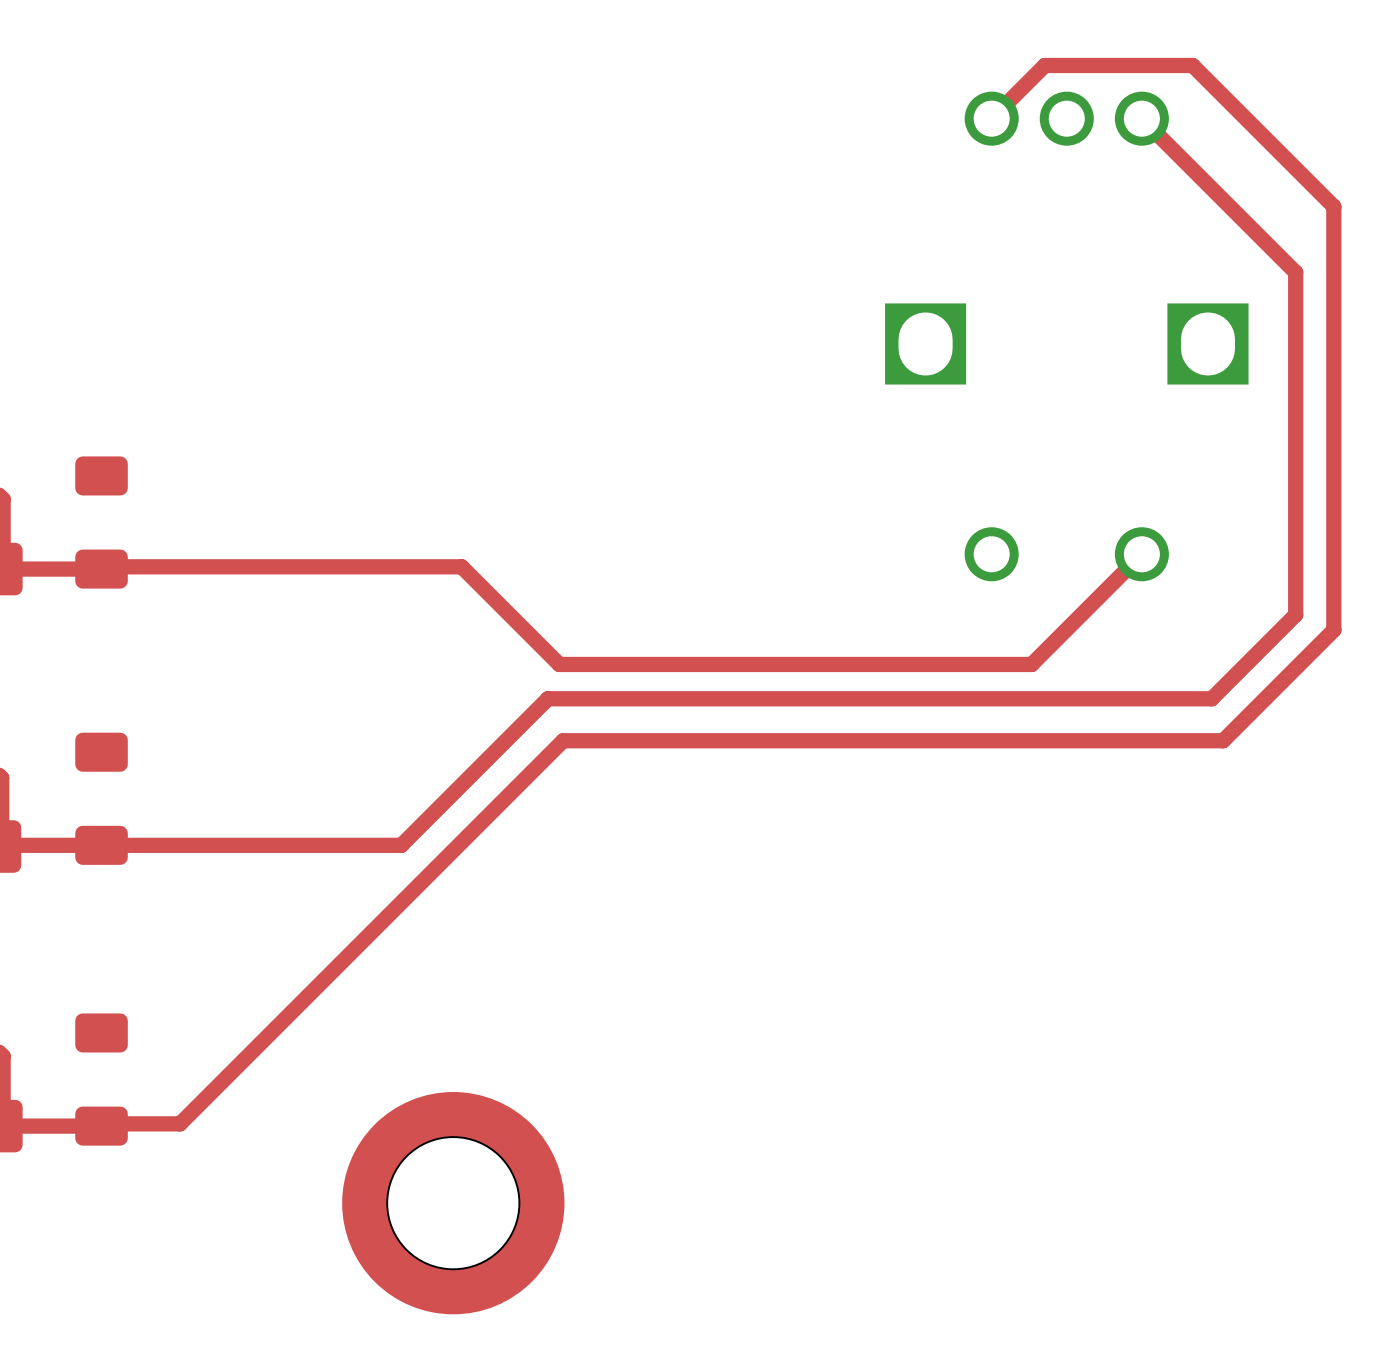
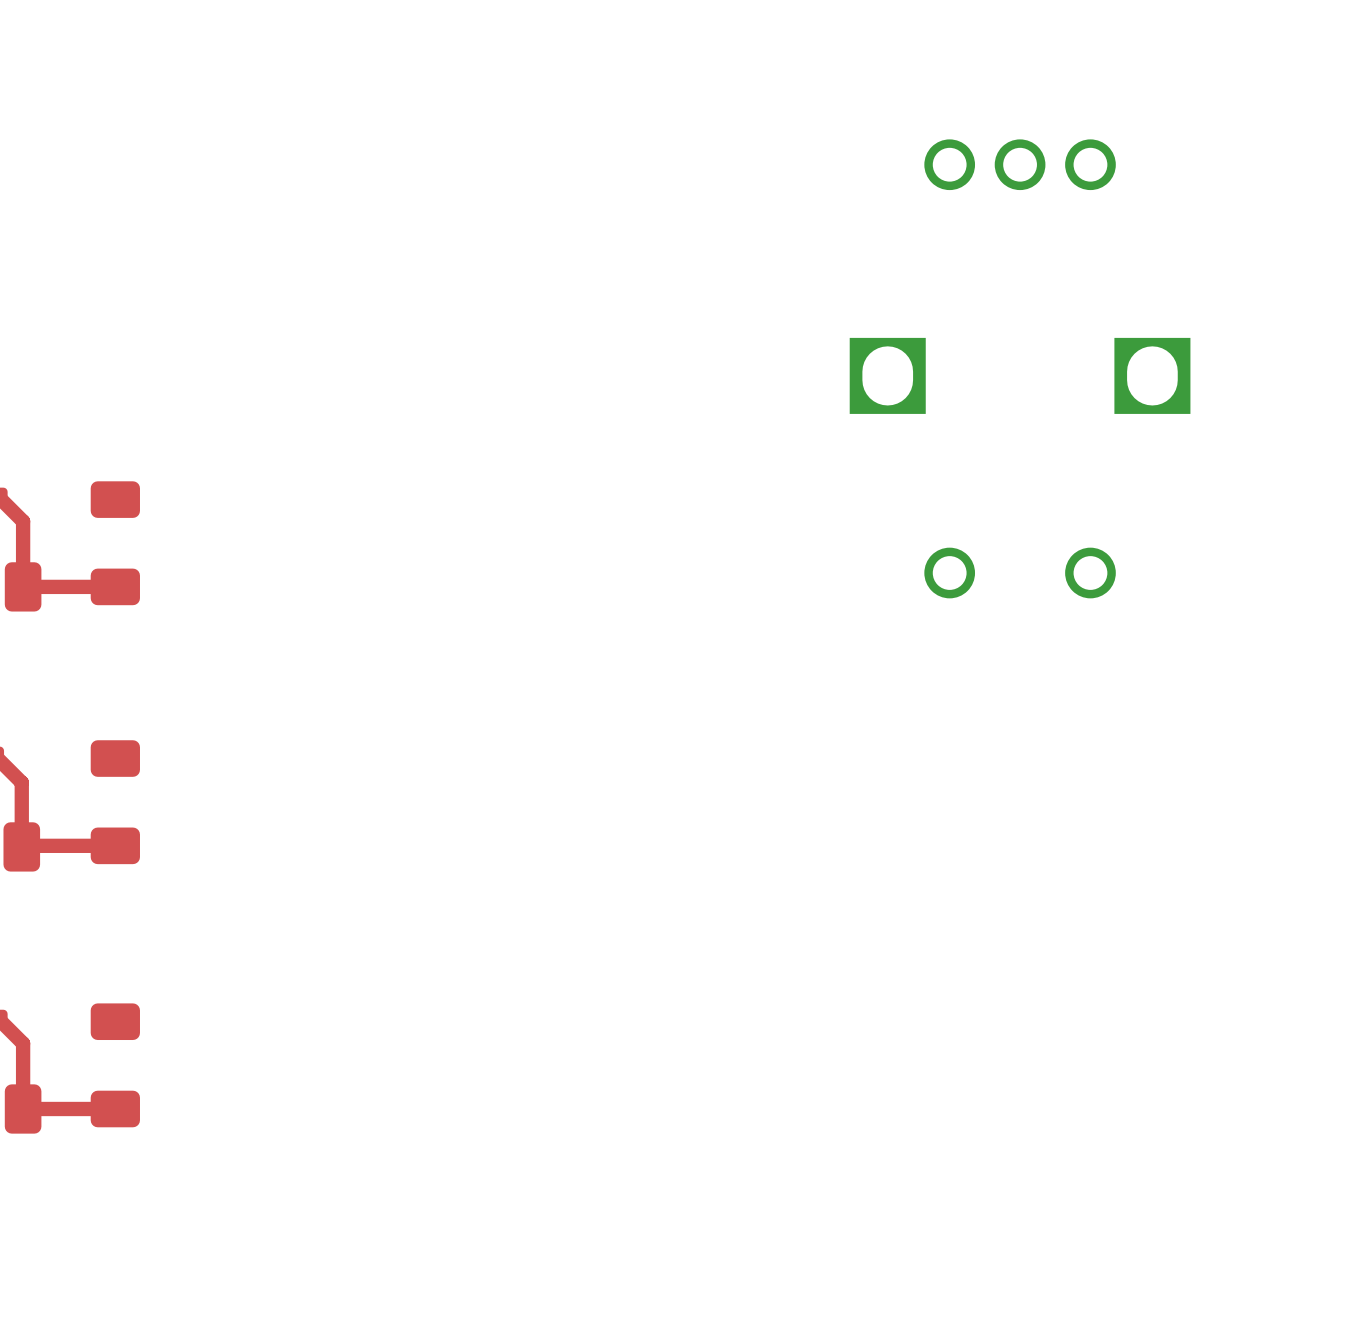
top track: (991, 118) (1044, 65) (1192, 65) (1333, 206) (1333, 630) (1223, 740) (563, 740) (180, 1123) (101, 1123) -> none
top track: (1141, 118) (1295, 272) (1295, 614) (1211, 698) (547, 698) (401, 845) (101, 845) -> none
top track: (1141, 554) (1031, 664) (559, 664) (461, 566) (101, 566) -> none
part: (453, 1203) -> none

